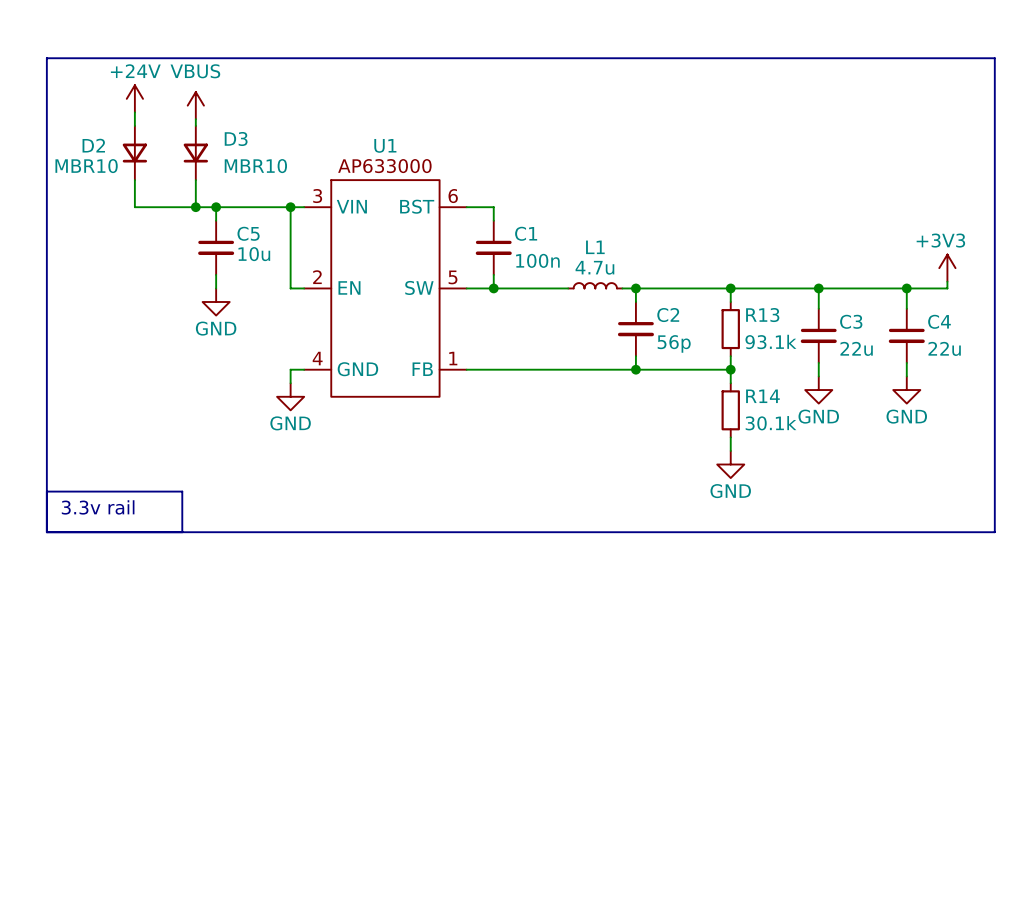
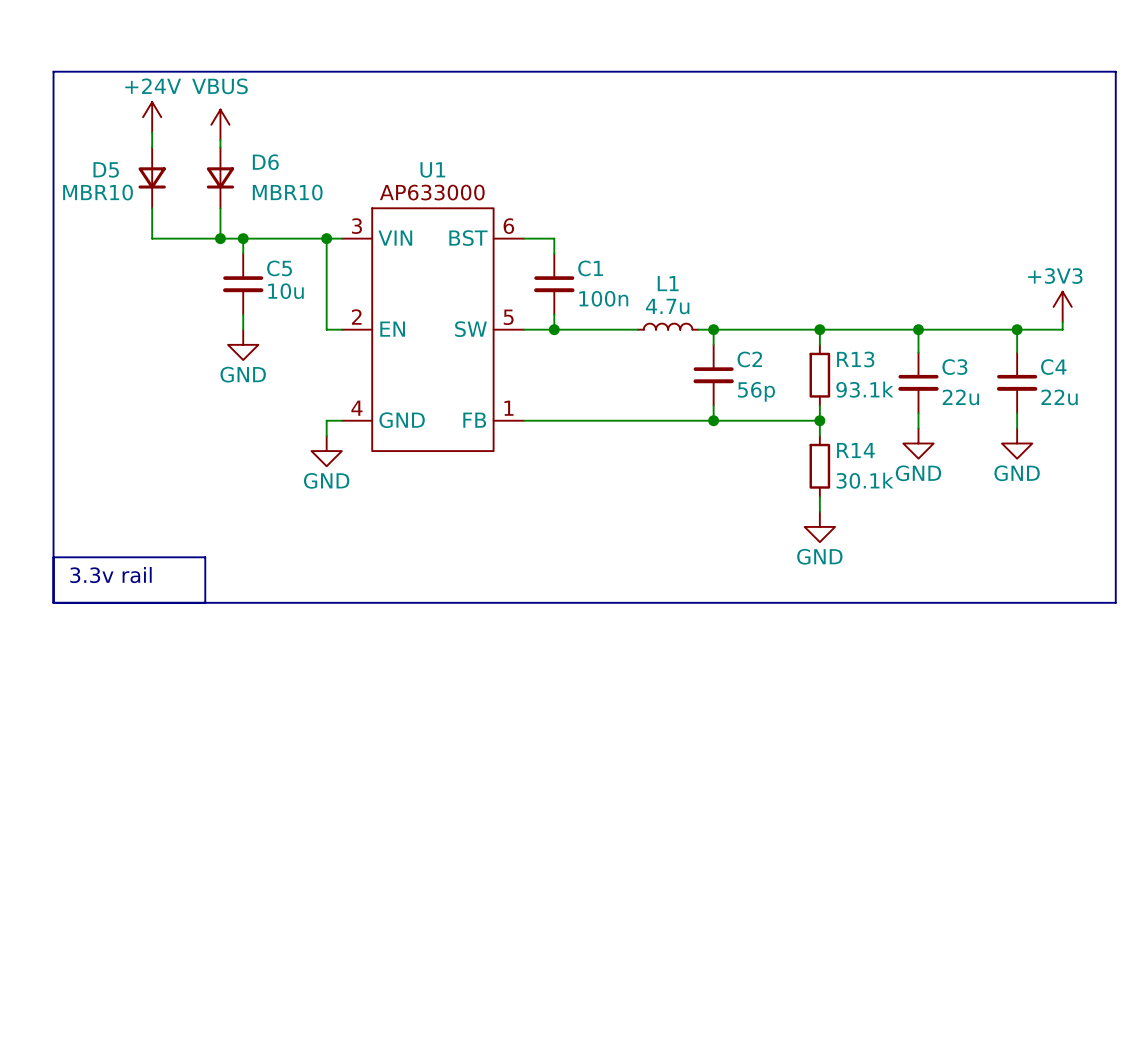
D3 name: D3 (236, 138) -> D6 (265, 162)
D2 name: D2 (93, 145) -> D5 (106, 169)

